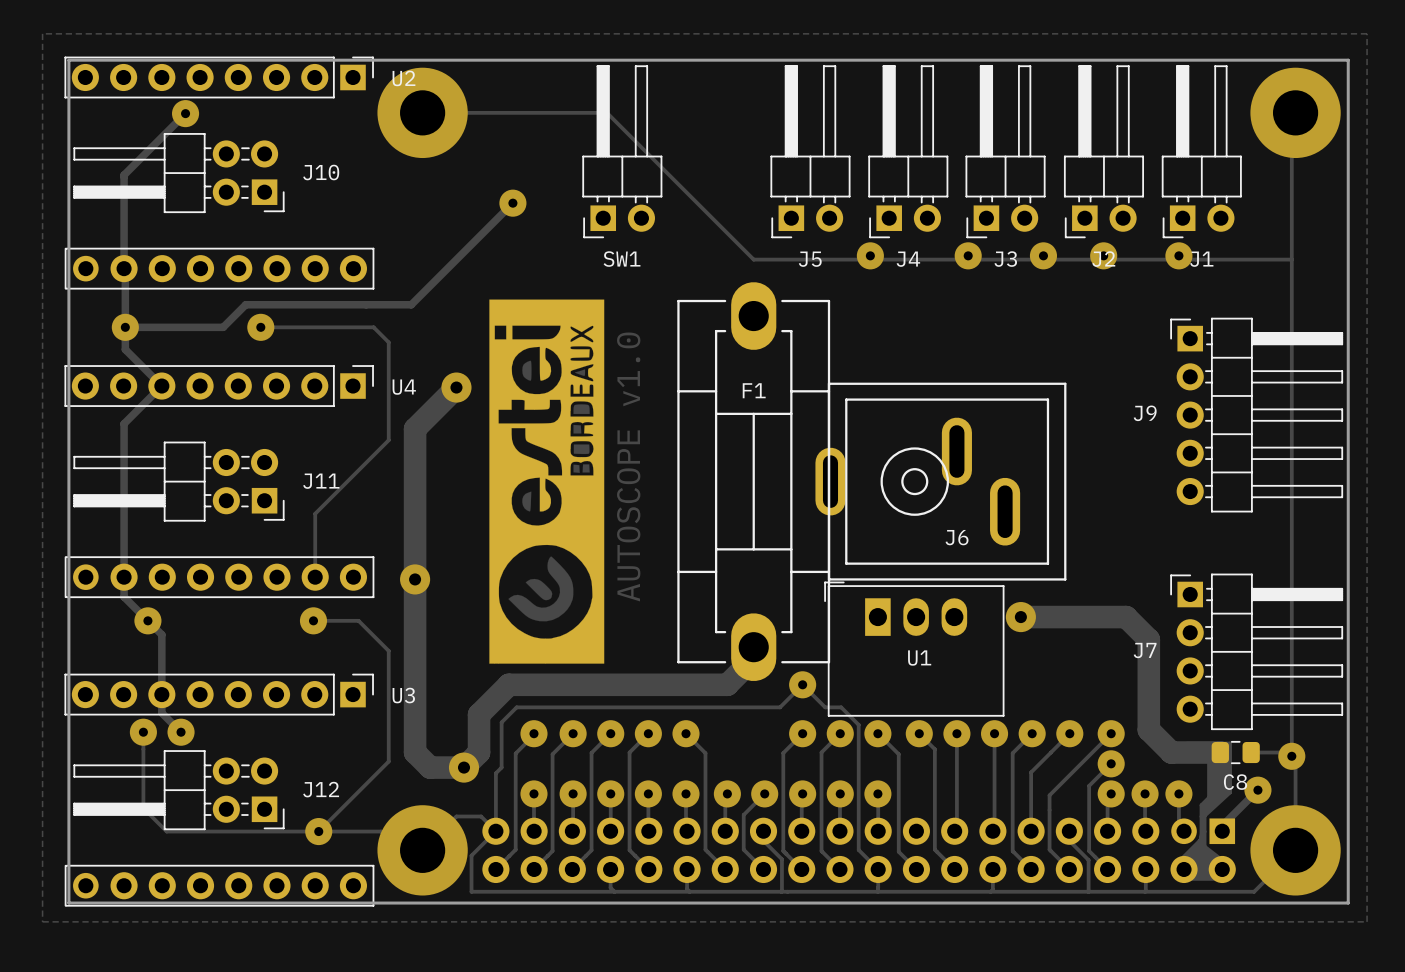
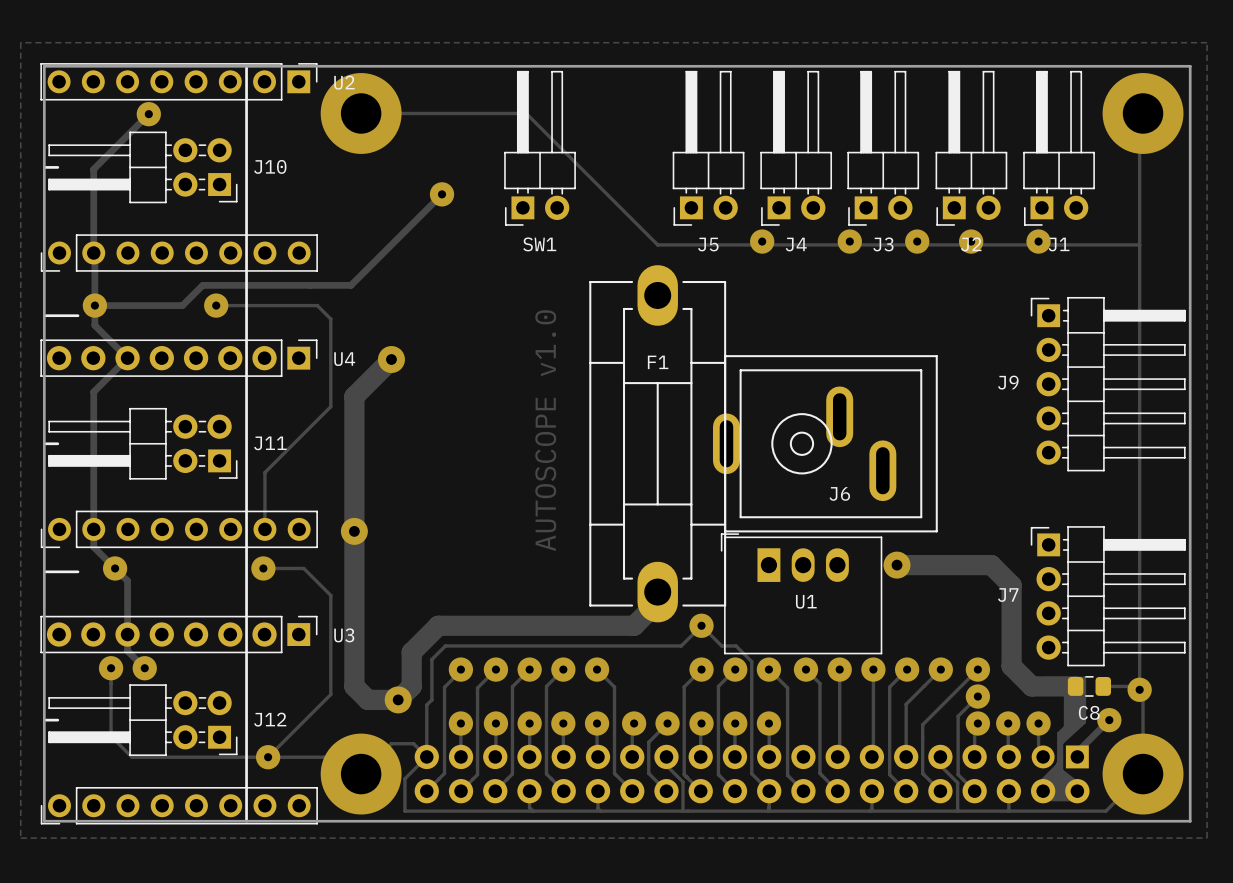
U2 footprint: [64, 56, 375, 290] -> [40, 63, 318, 272]
line: none -> (246, 66) (246, 821)
line: none -> (44, 167) (57, 167)
line: none -> (44, 315) (78, 315)
U4 footprint: [64, 365, 375, 599] -> [40, 339, 318, 549]
line: none -> (44, 443) (57, 443)
part: (546, 481) -> none
line: none -> (44, 571) (78, 571)
U3 footprint: [64, 673, 375, 907] -> [40, 615, 318, 825]
line: none -> (44, 720) (57, 720)

